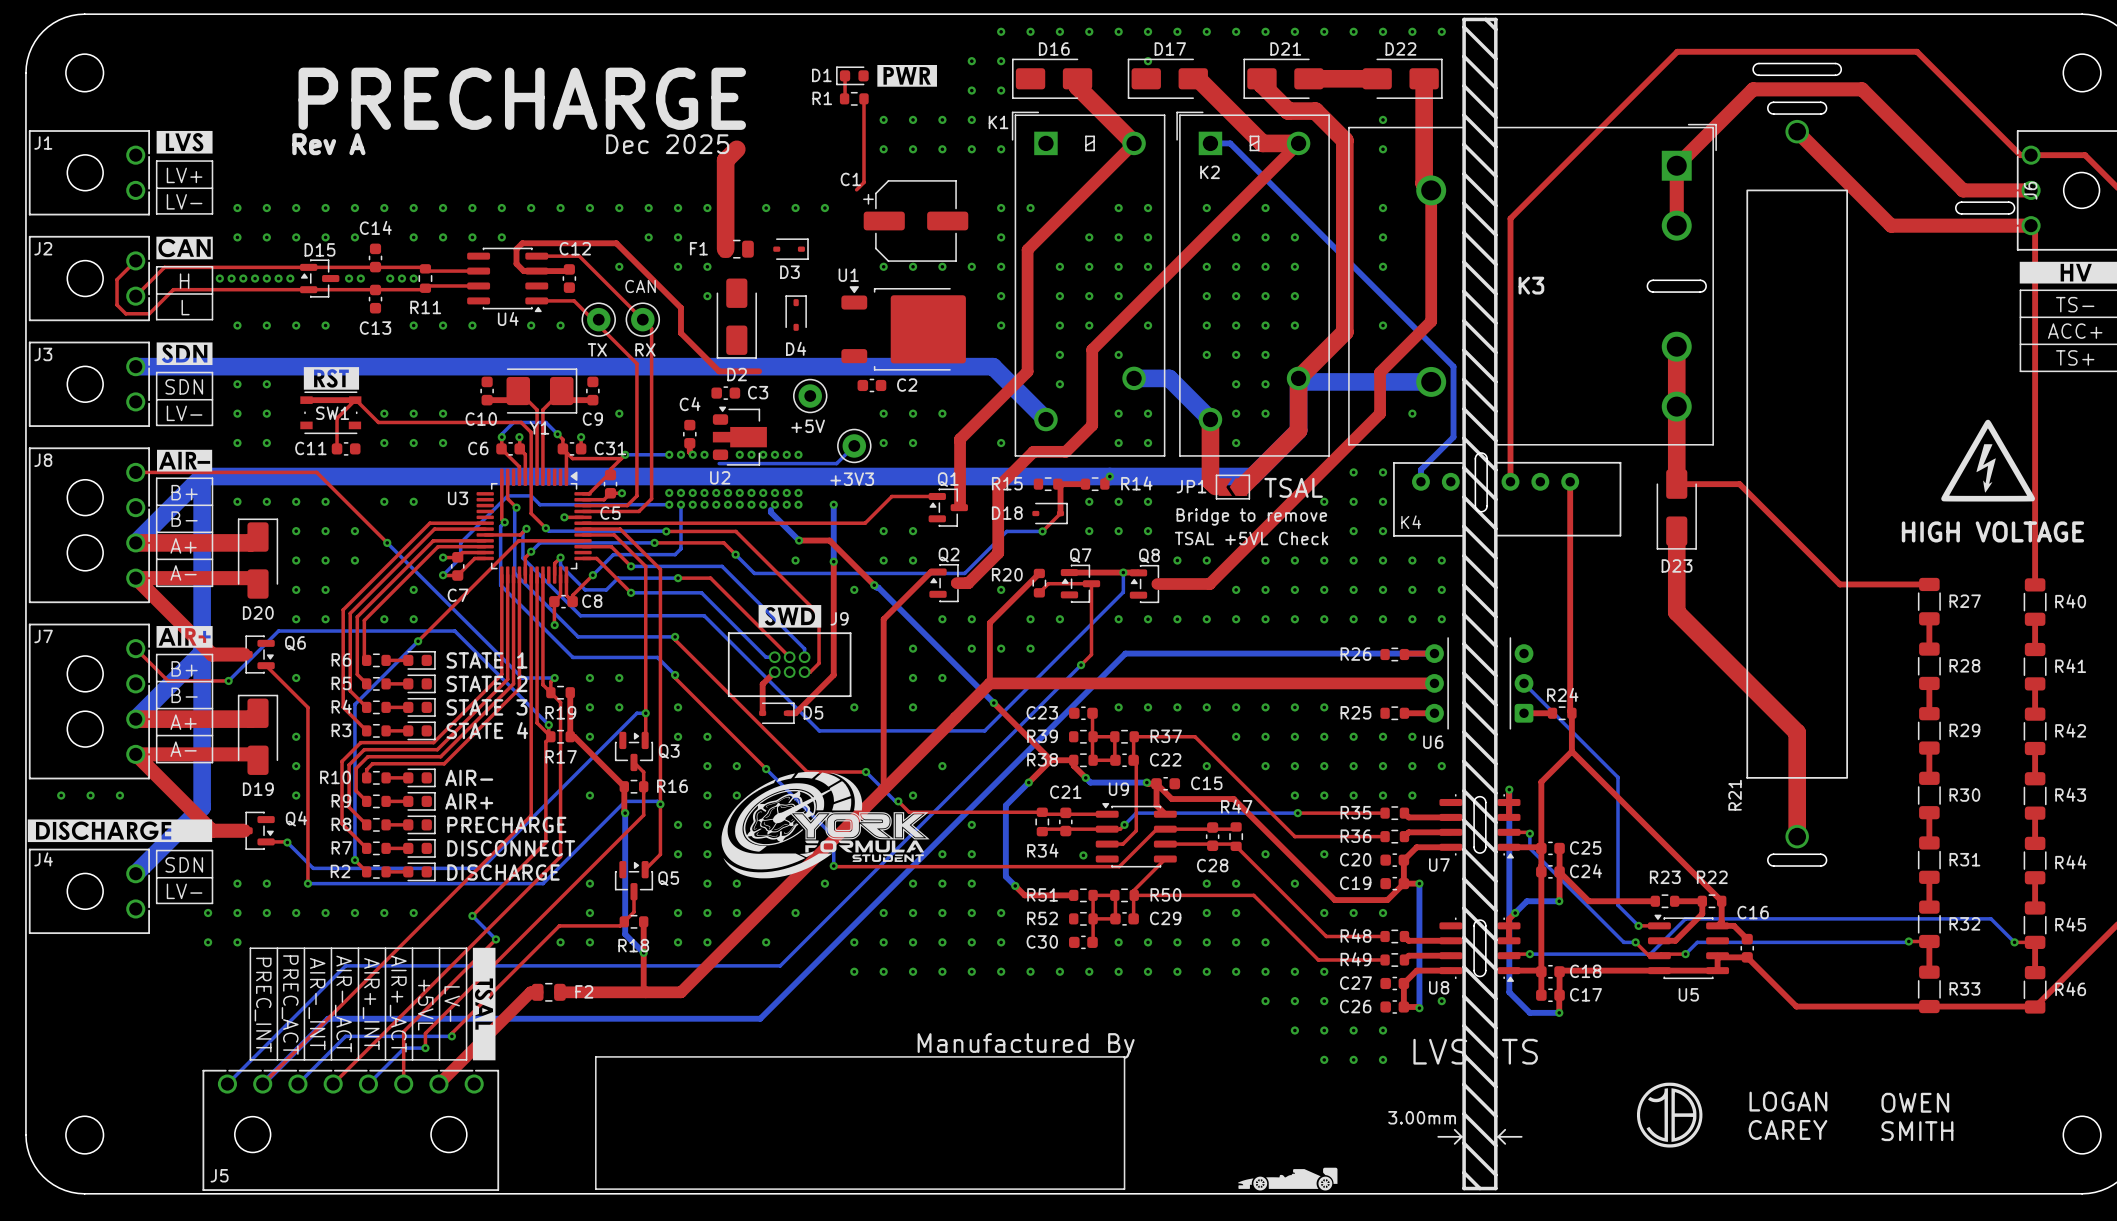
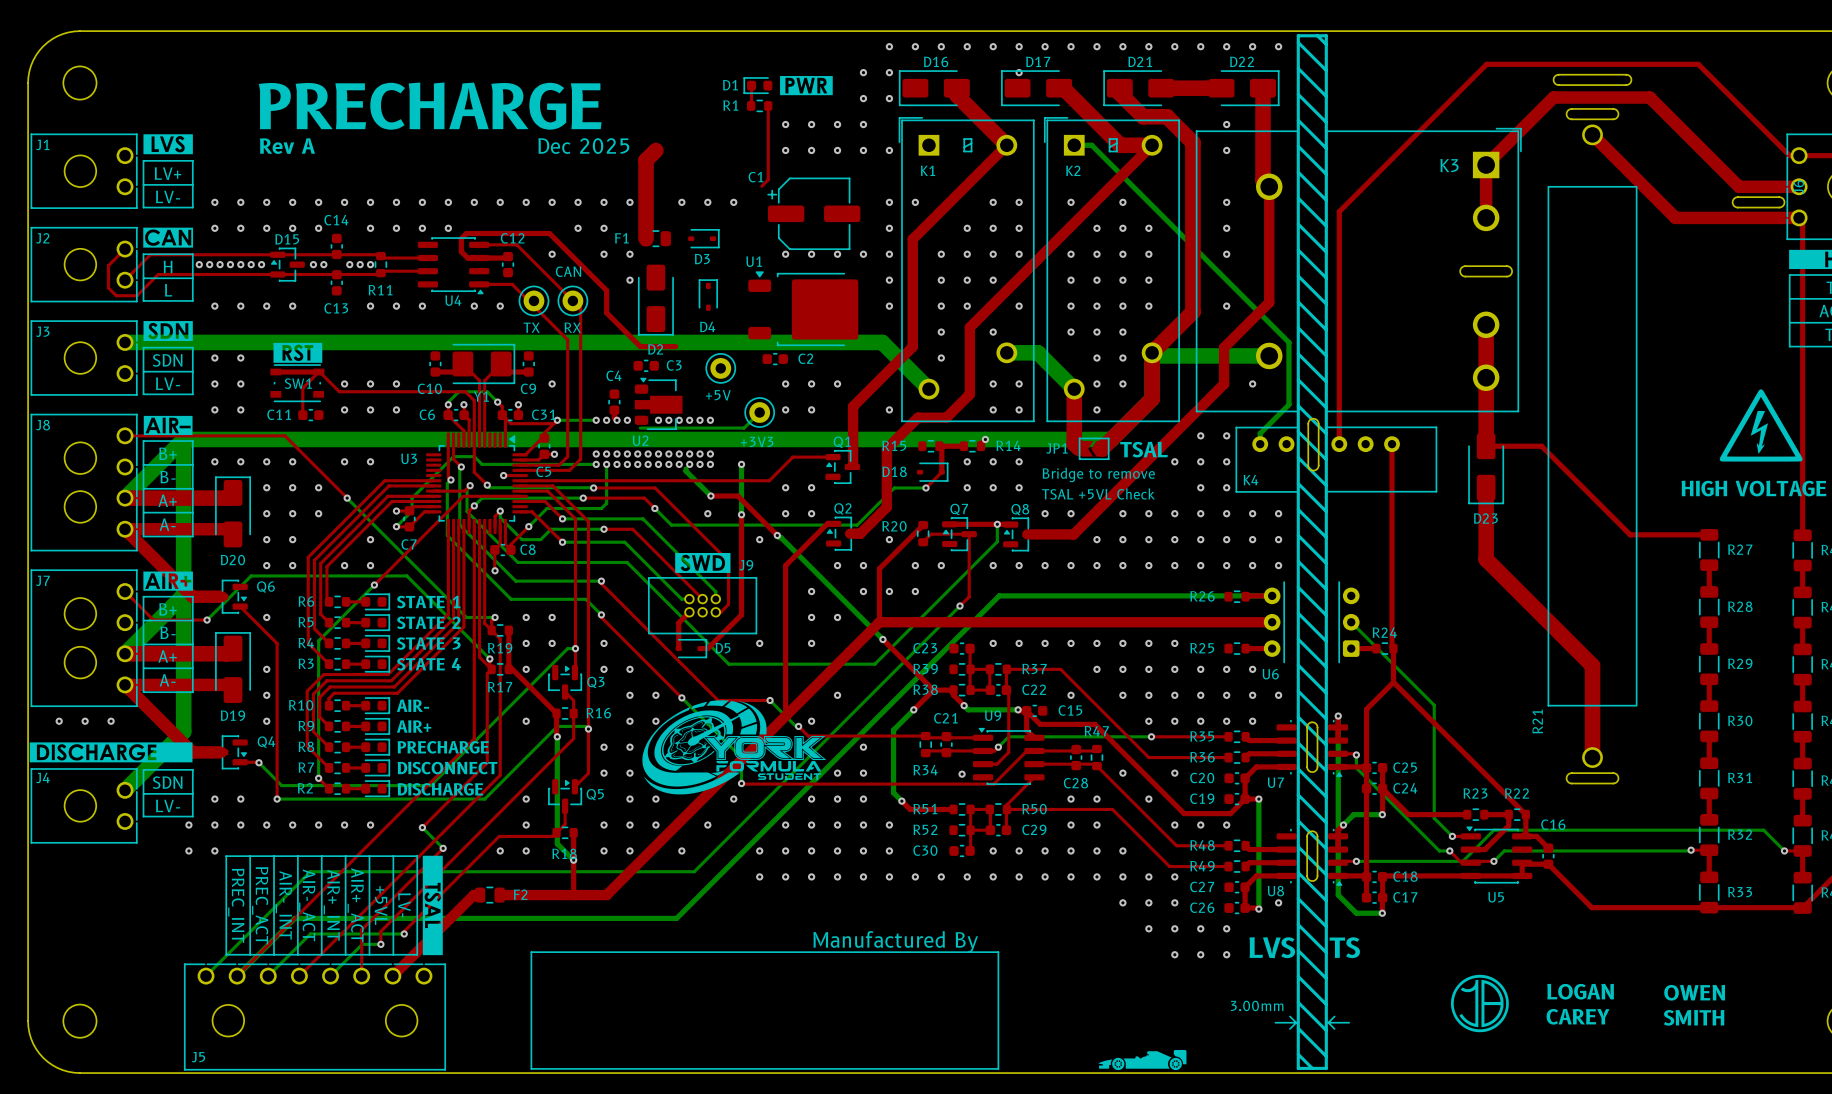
K1 name position: K1 (998, 122) -> K1 (928, 170)
K3 name position: K3 (1531, 285) -> K3 (1449, 165)

